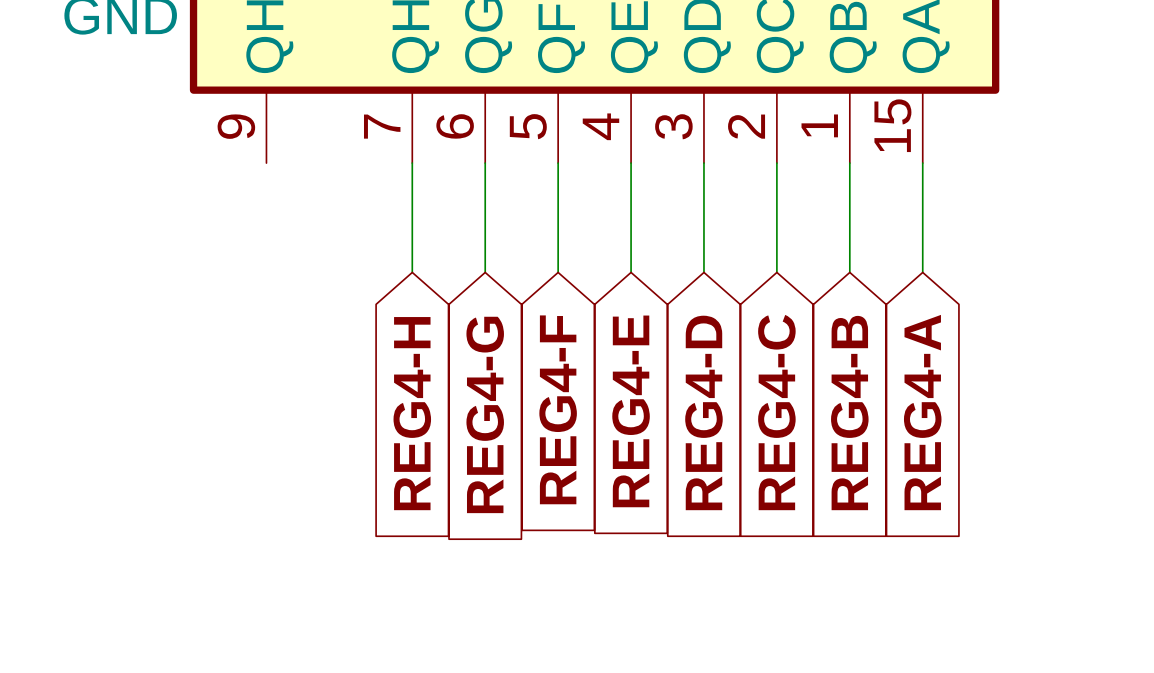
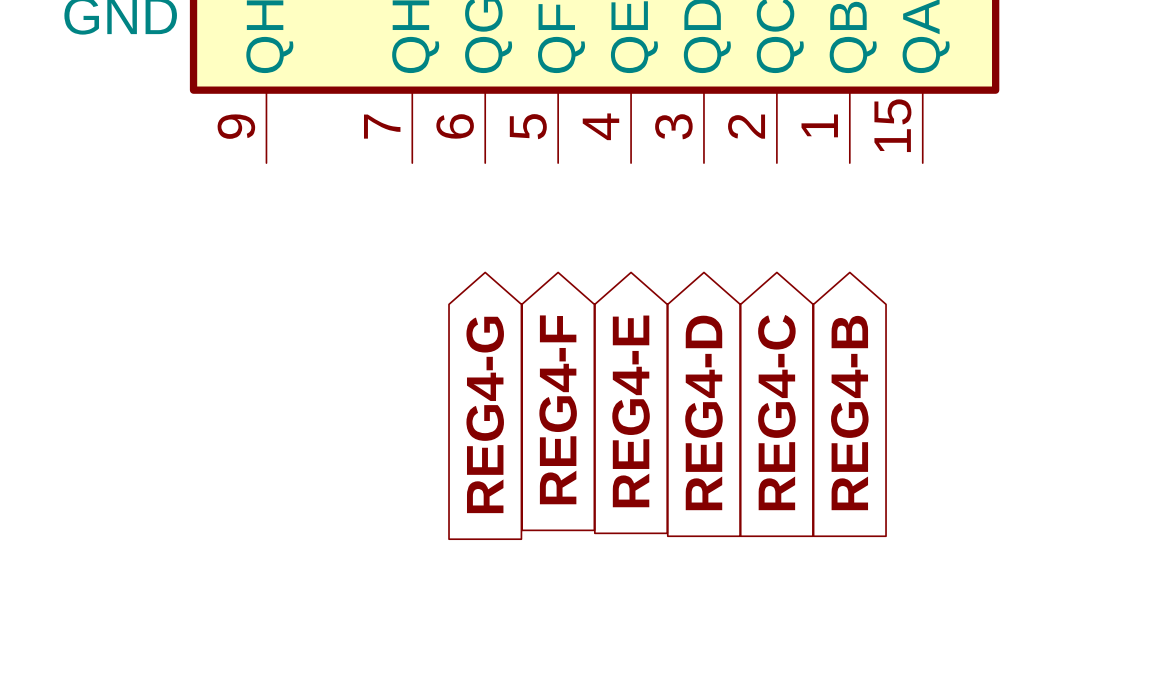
wire: (412, 163) (412, 272) -> none
wire: (485, 163) (485, 272) -> none
wire: (558, 163) (558, 272) -> none
wire: (631, 163) (631, 272) -> none
wire: (703, 163) (703, 272) -> none
wire: (776, 163) (776, 272) -> none
wire: (849, 163) (849, 272) -> none
wire: (922, 163) (922, 272) -> none
global label: REG4-A (922, 412) -> none
global label: REG4-H (412, 413) -> none

